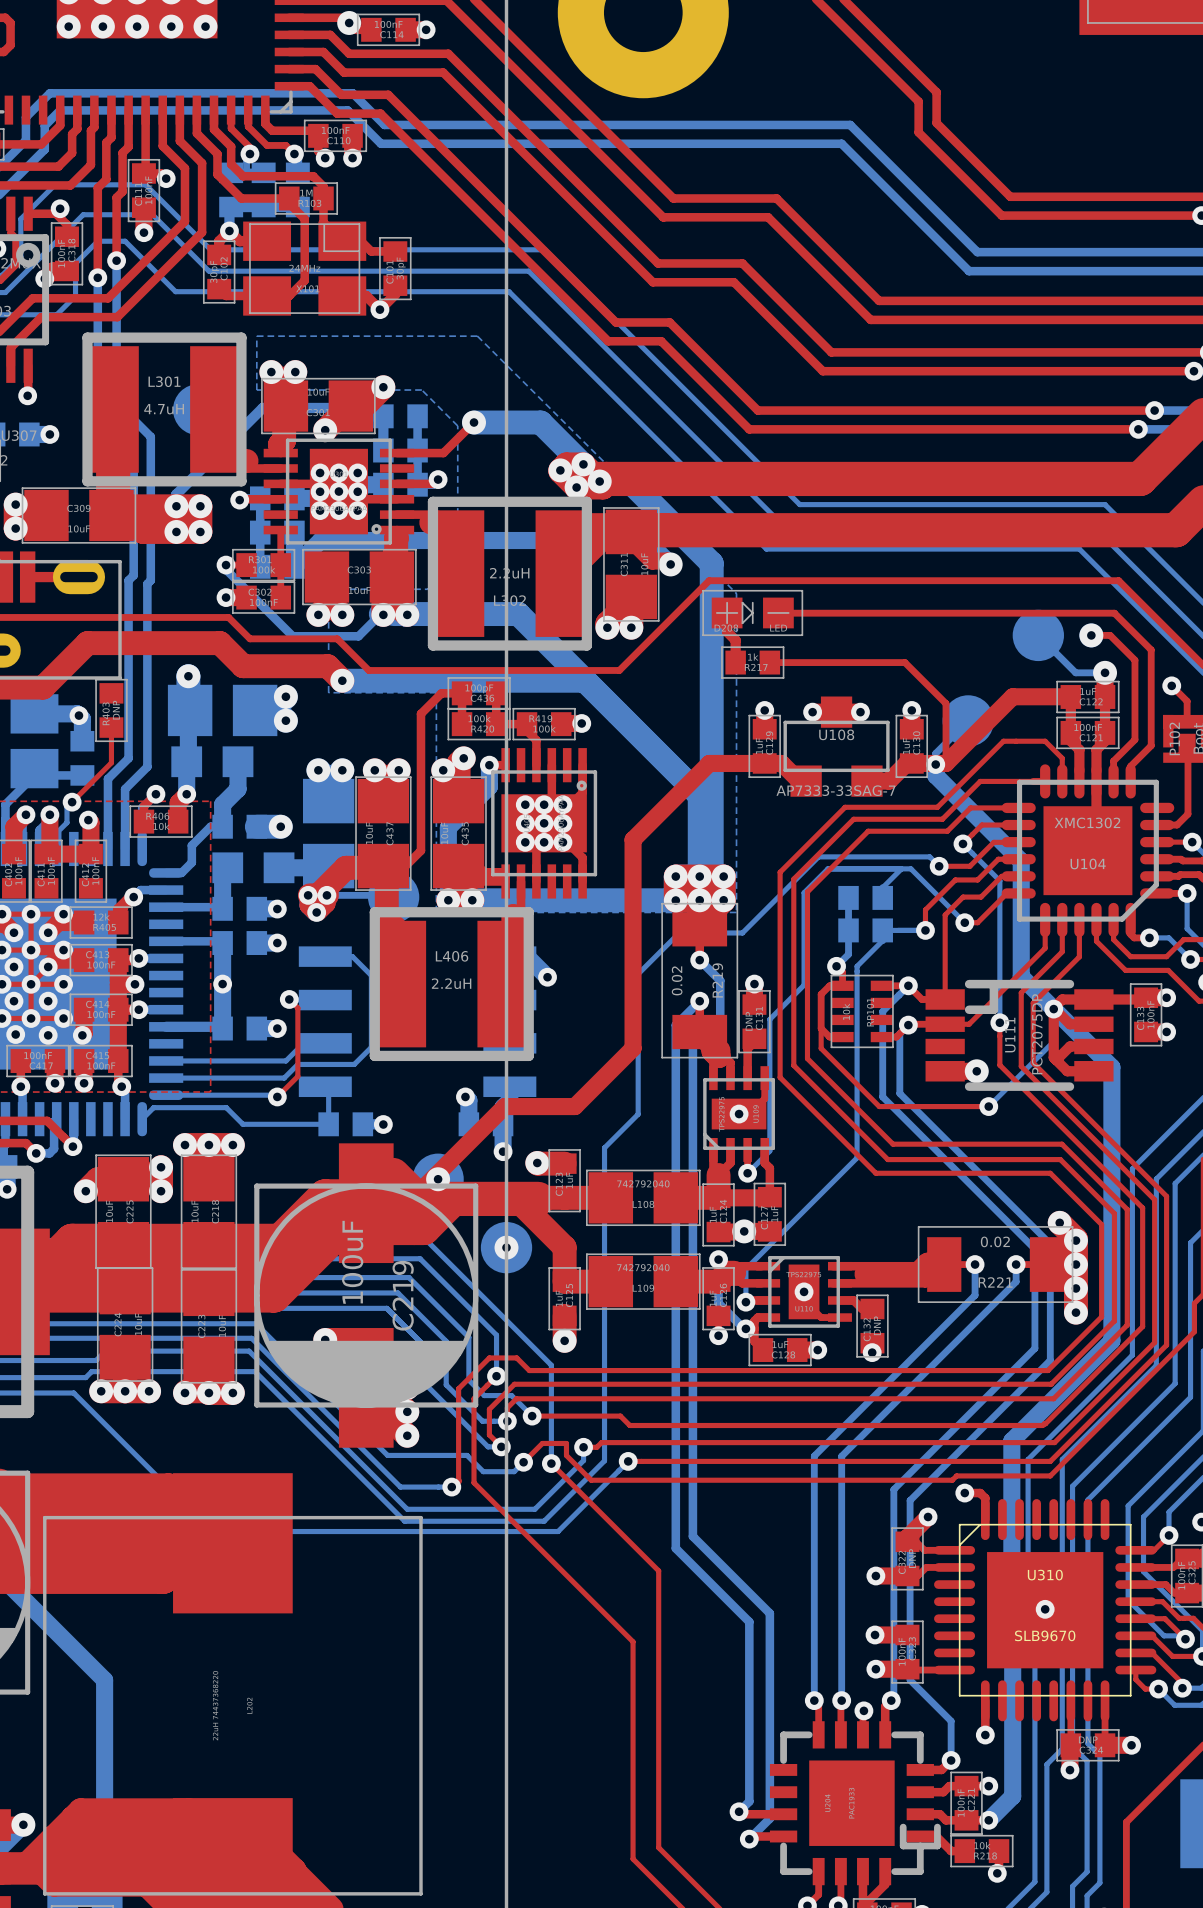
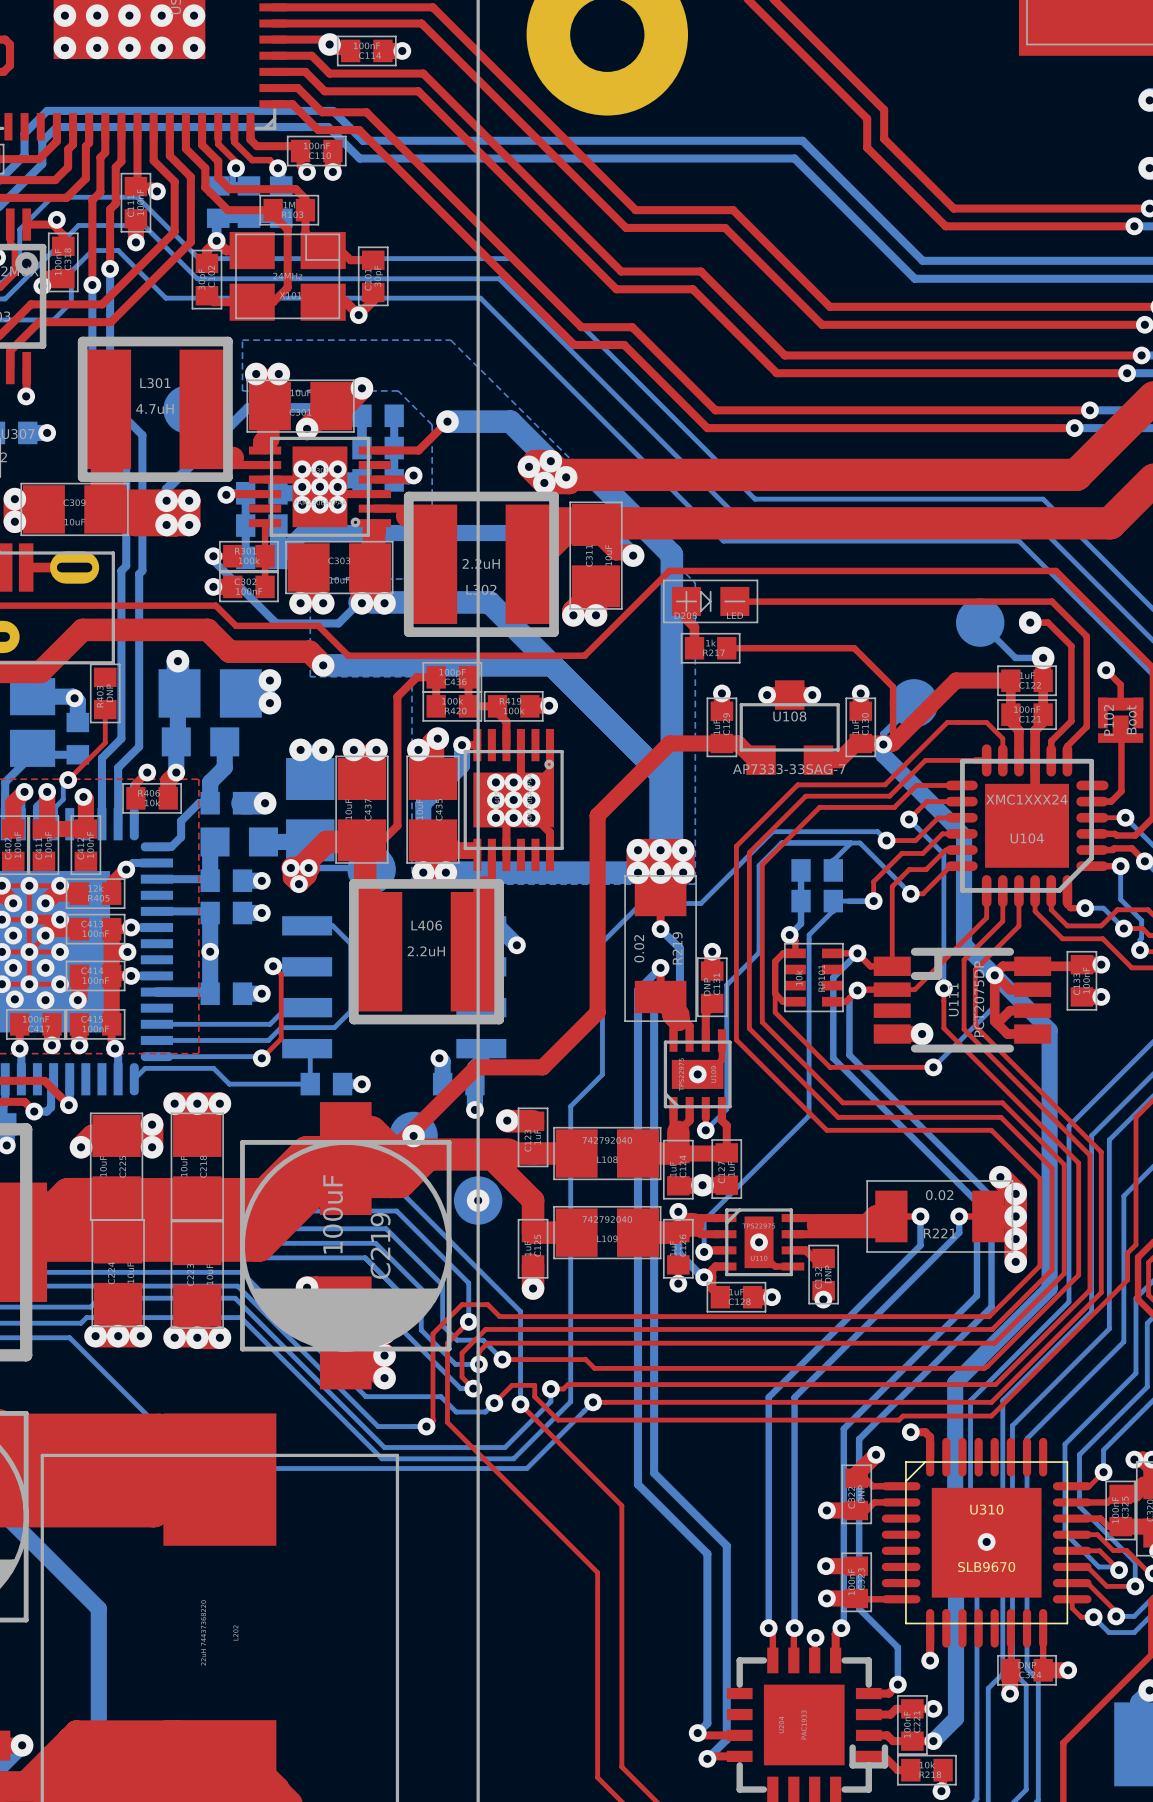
U104 value: XMC1302 (1087, 822) -> XMC1XXX24 (1026, 799)

